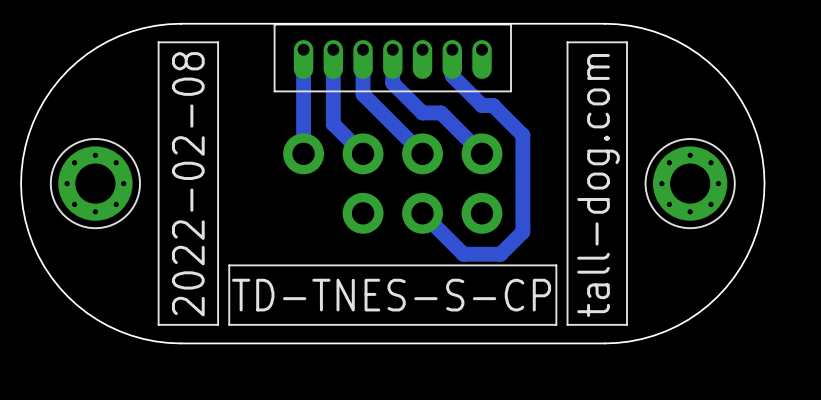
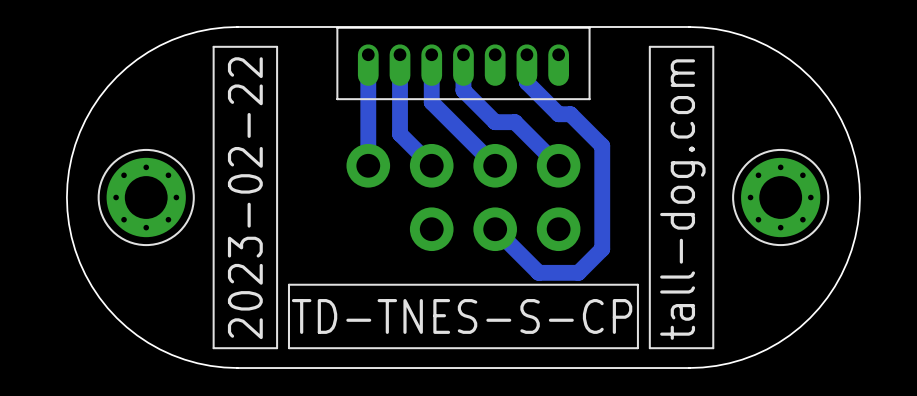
text: 2022-02-08 (188, 184) -> 2023-02-22 (245, 198)

